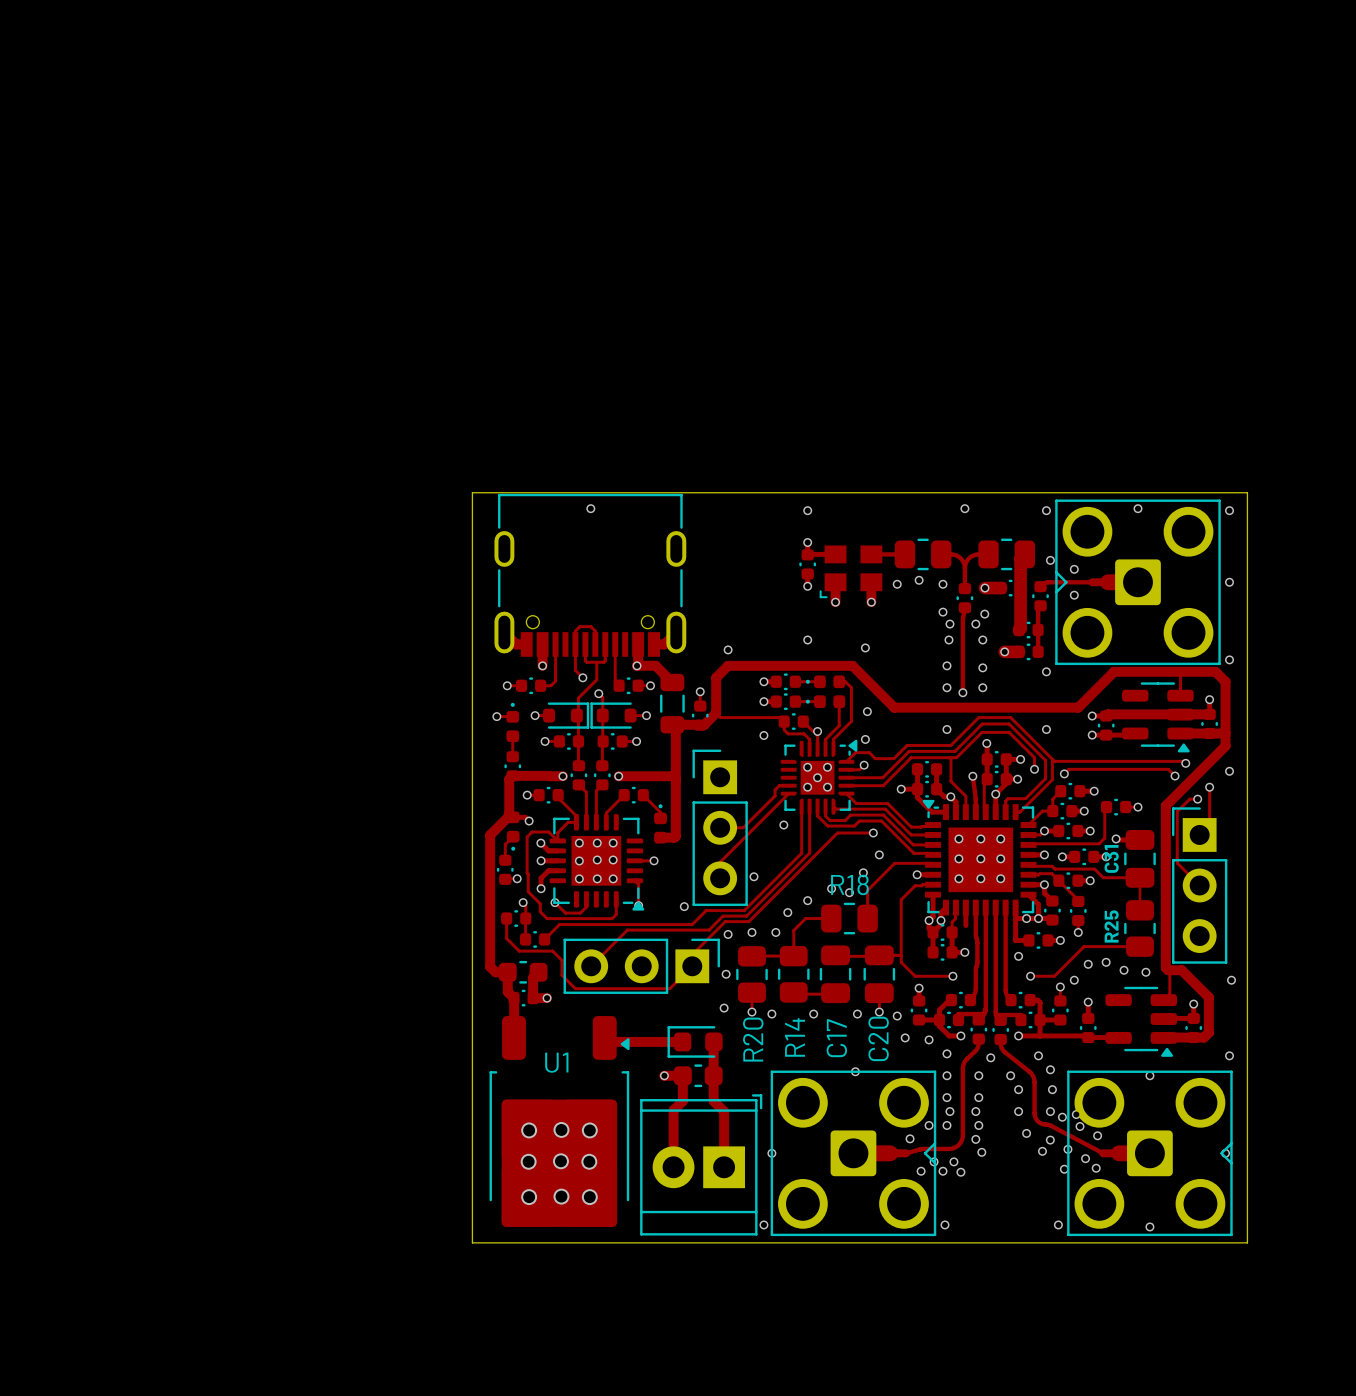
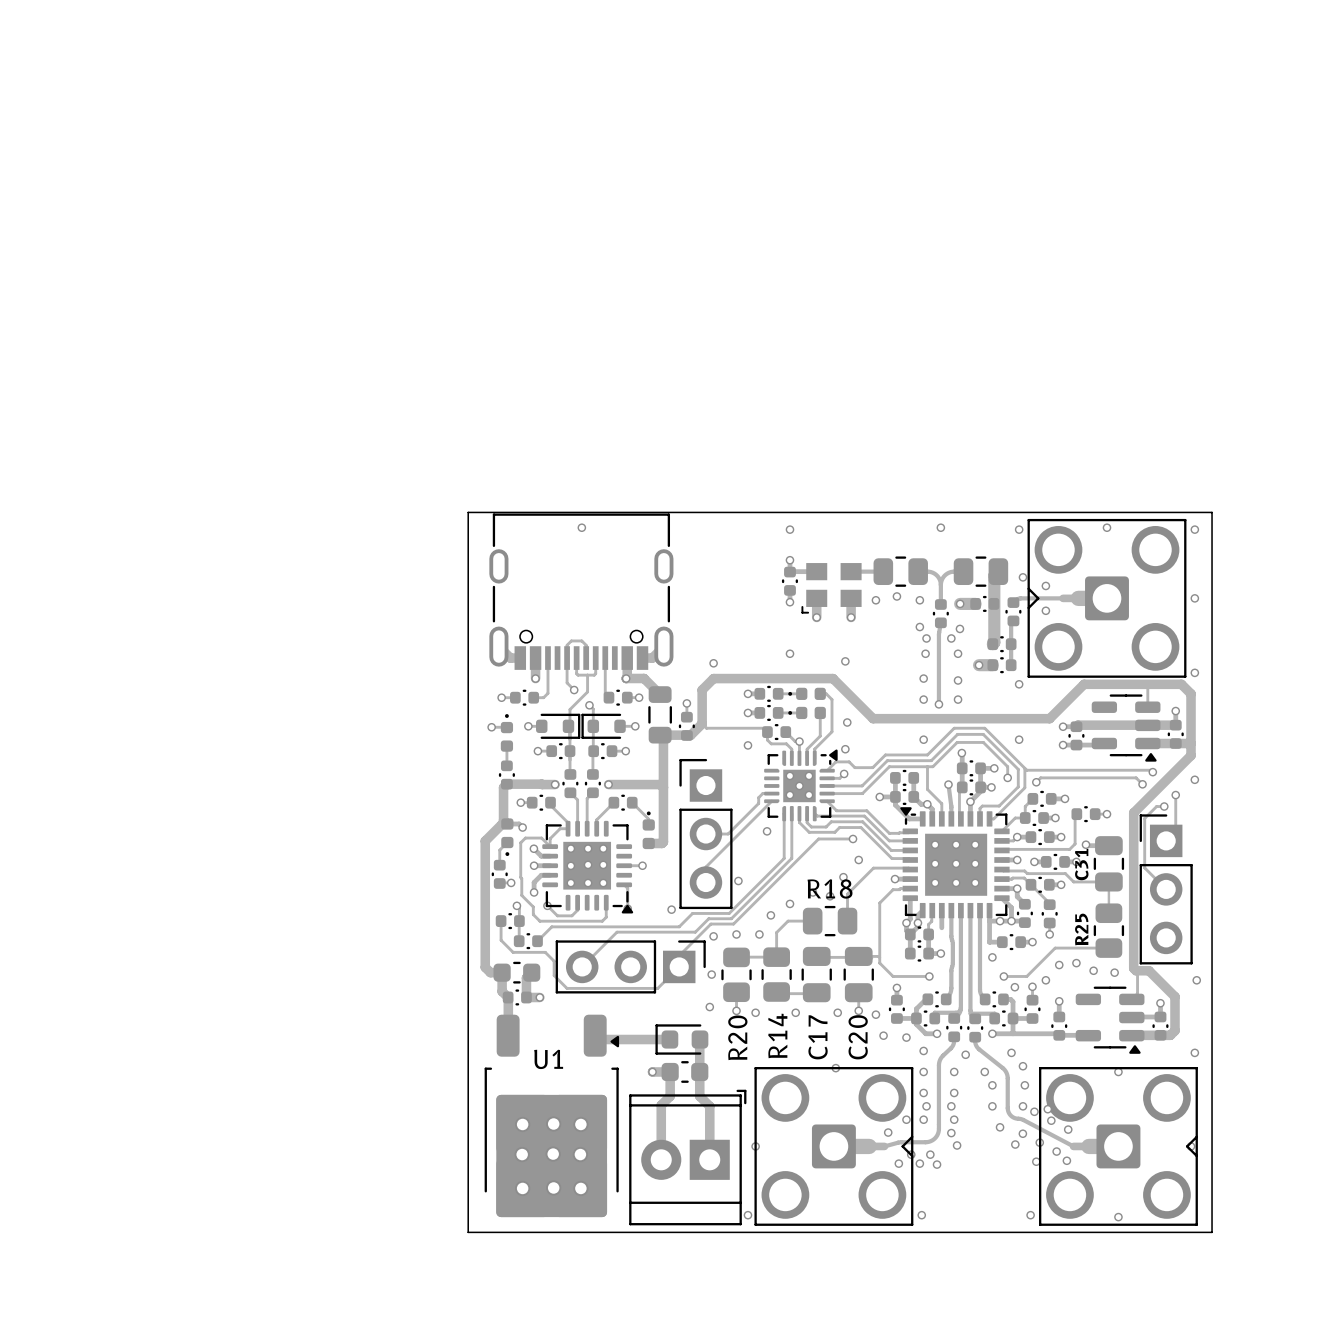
via: none -> (1014, 987)

